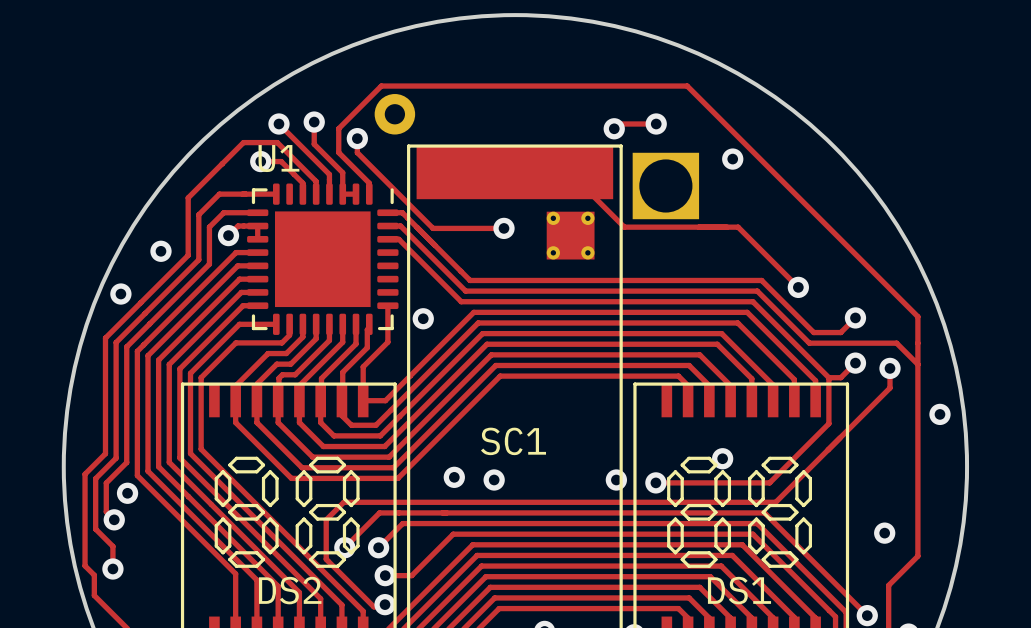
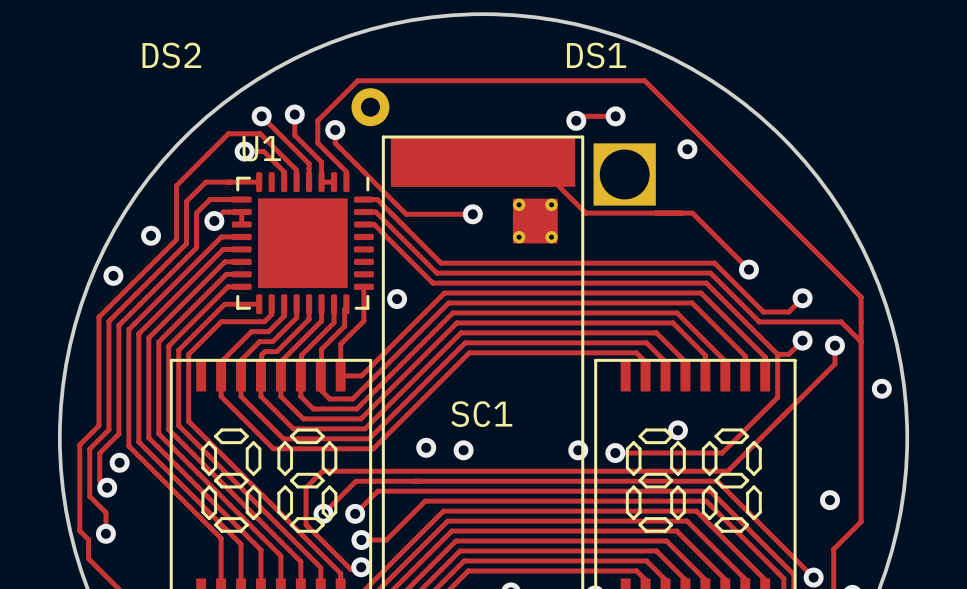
DS2 name position: DS2 (290, 590) -> DS2 (171, 55)
DS1 name position: DS1 (739, 590) -> DS1 (596, 55)

